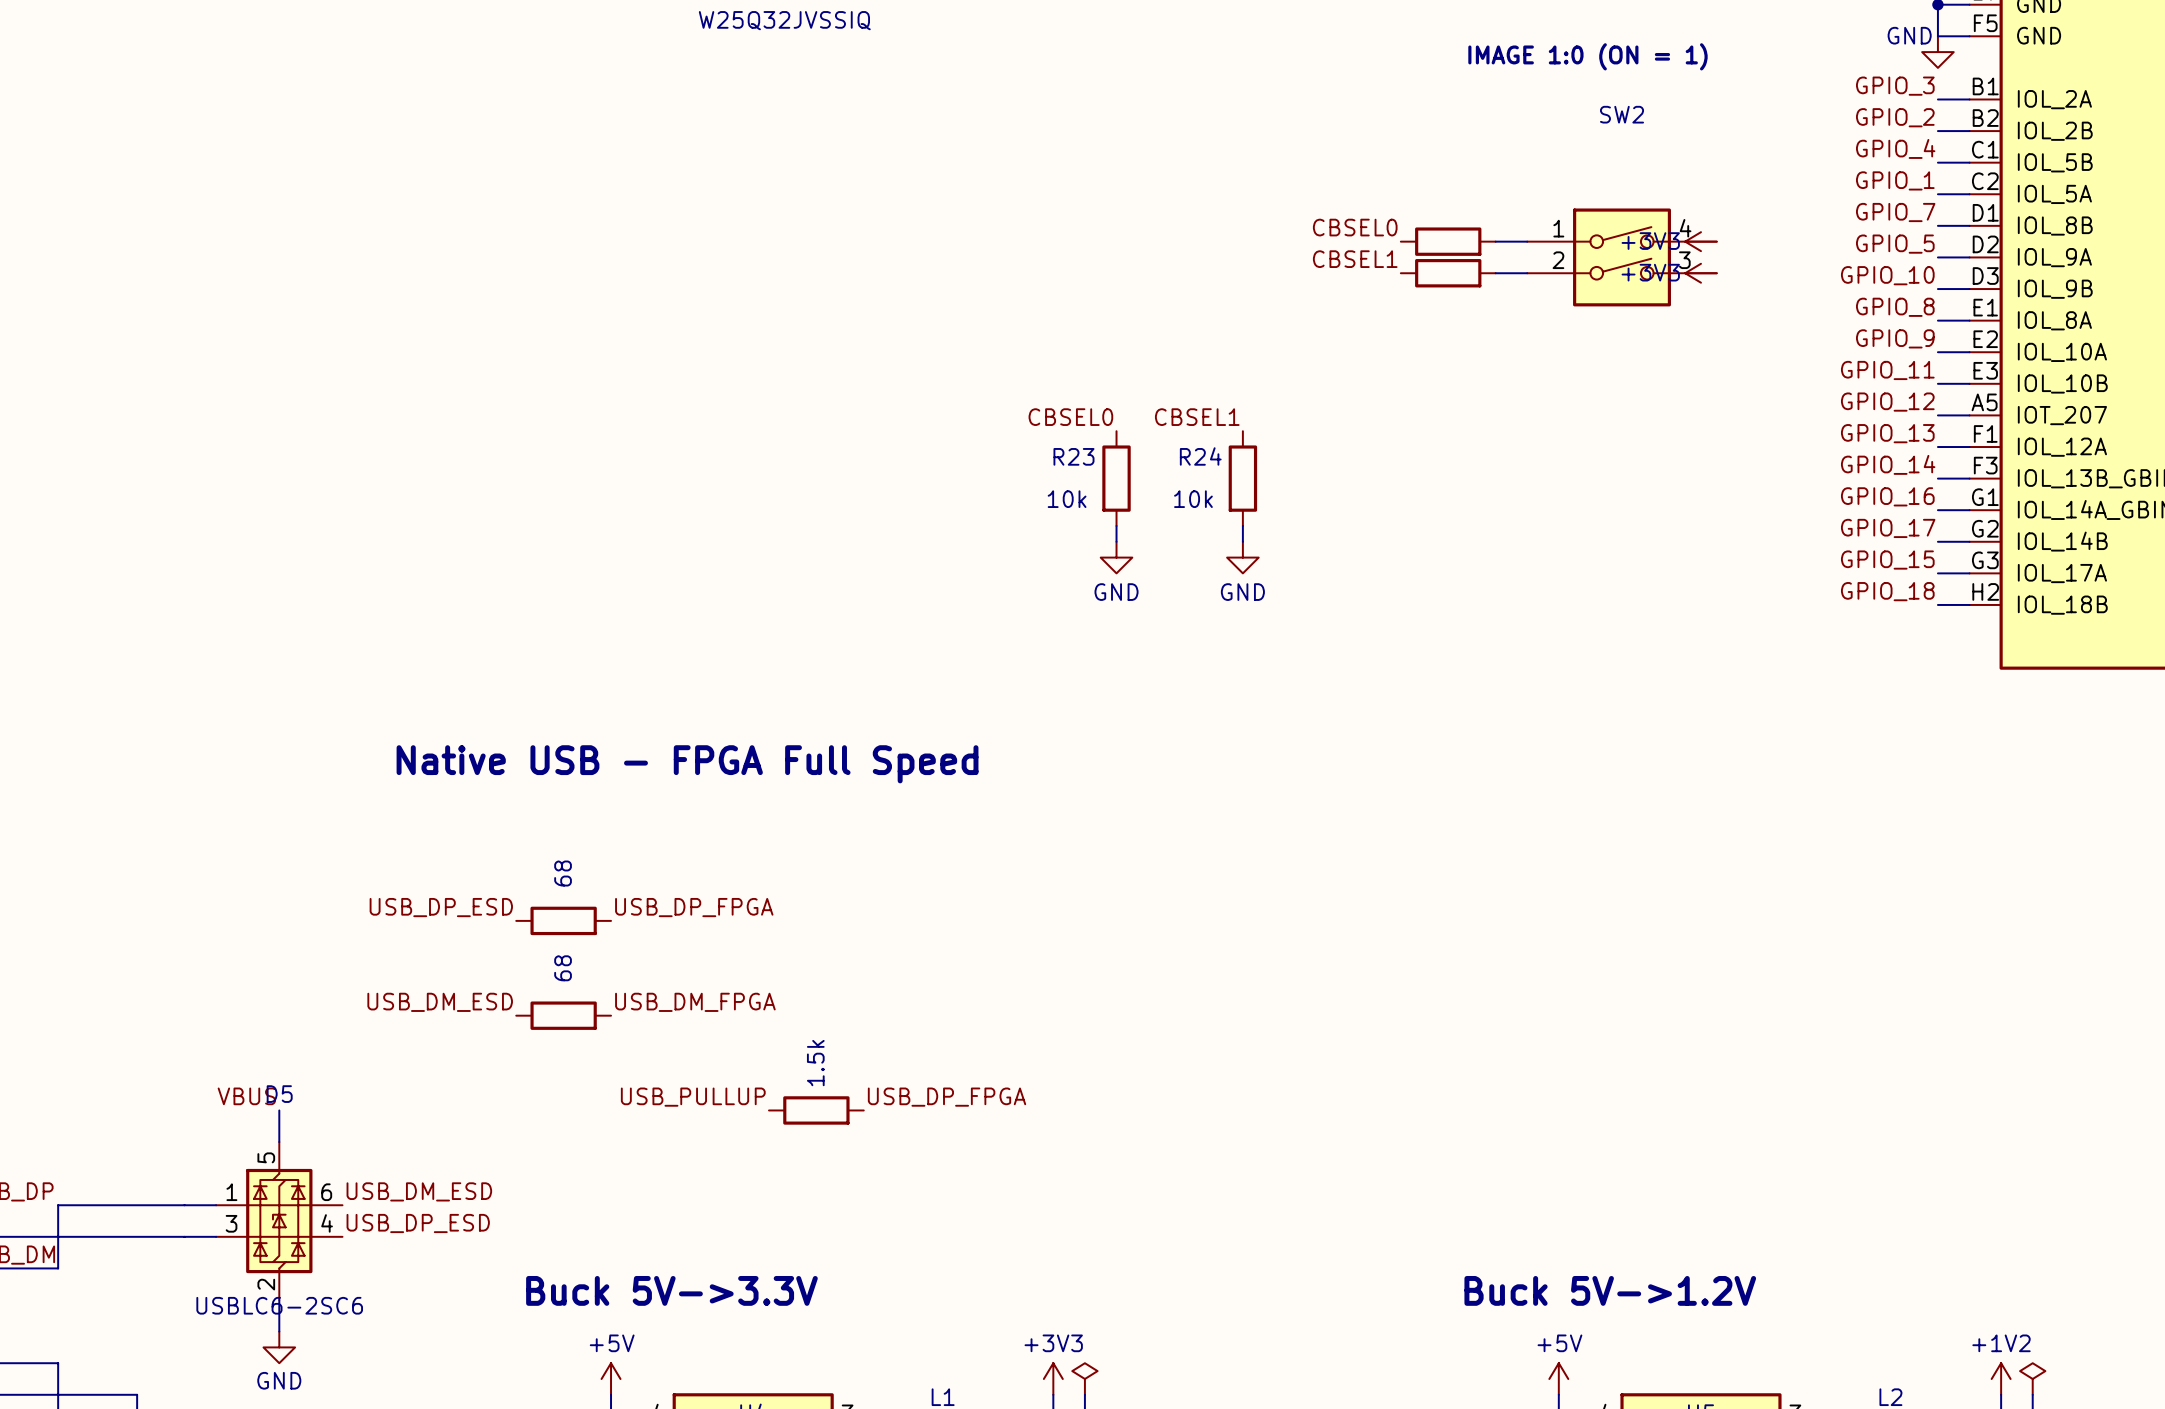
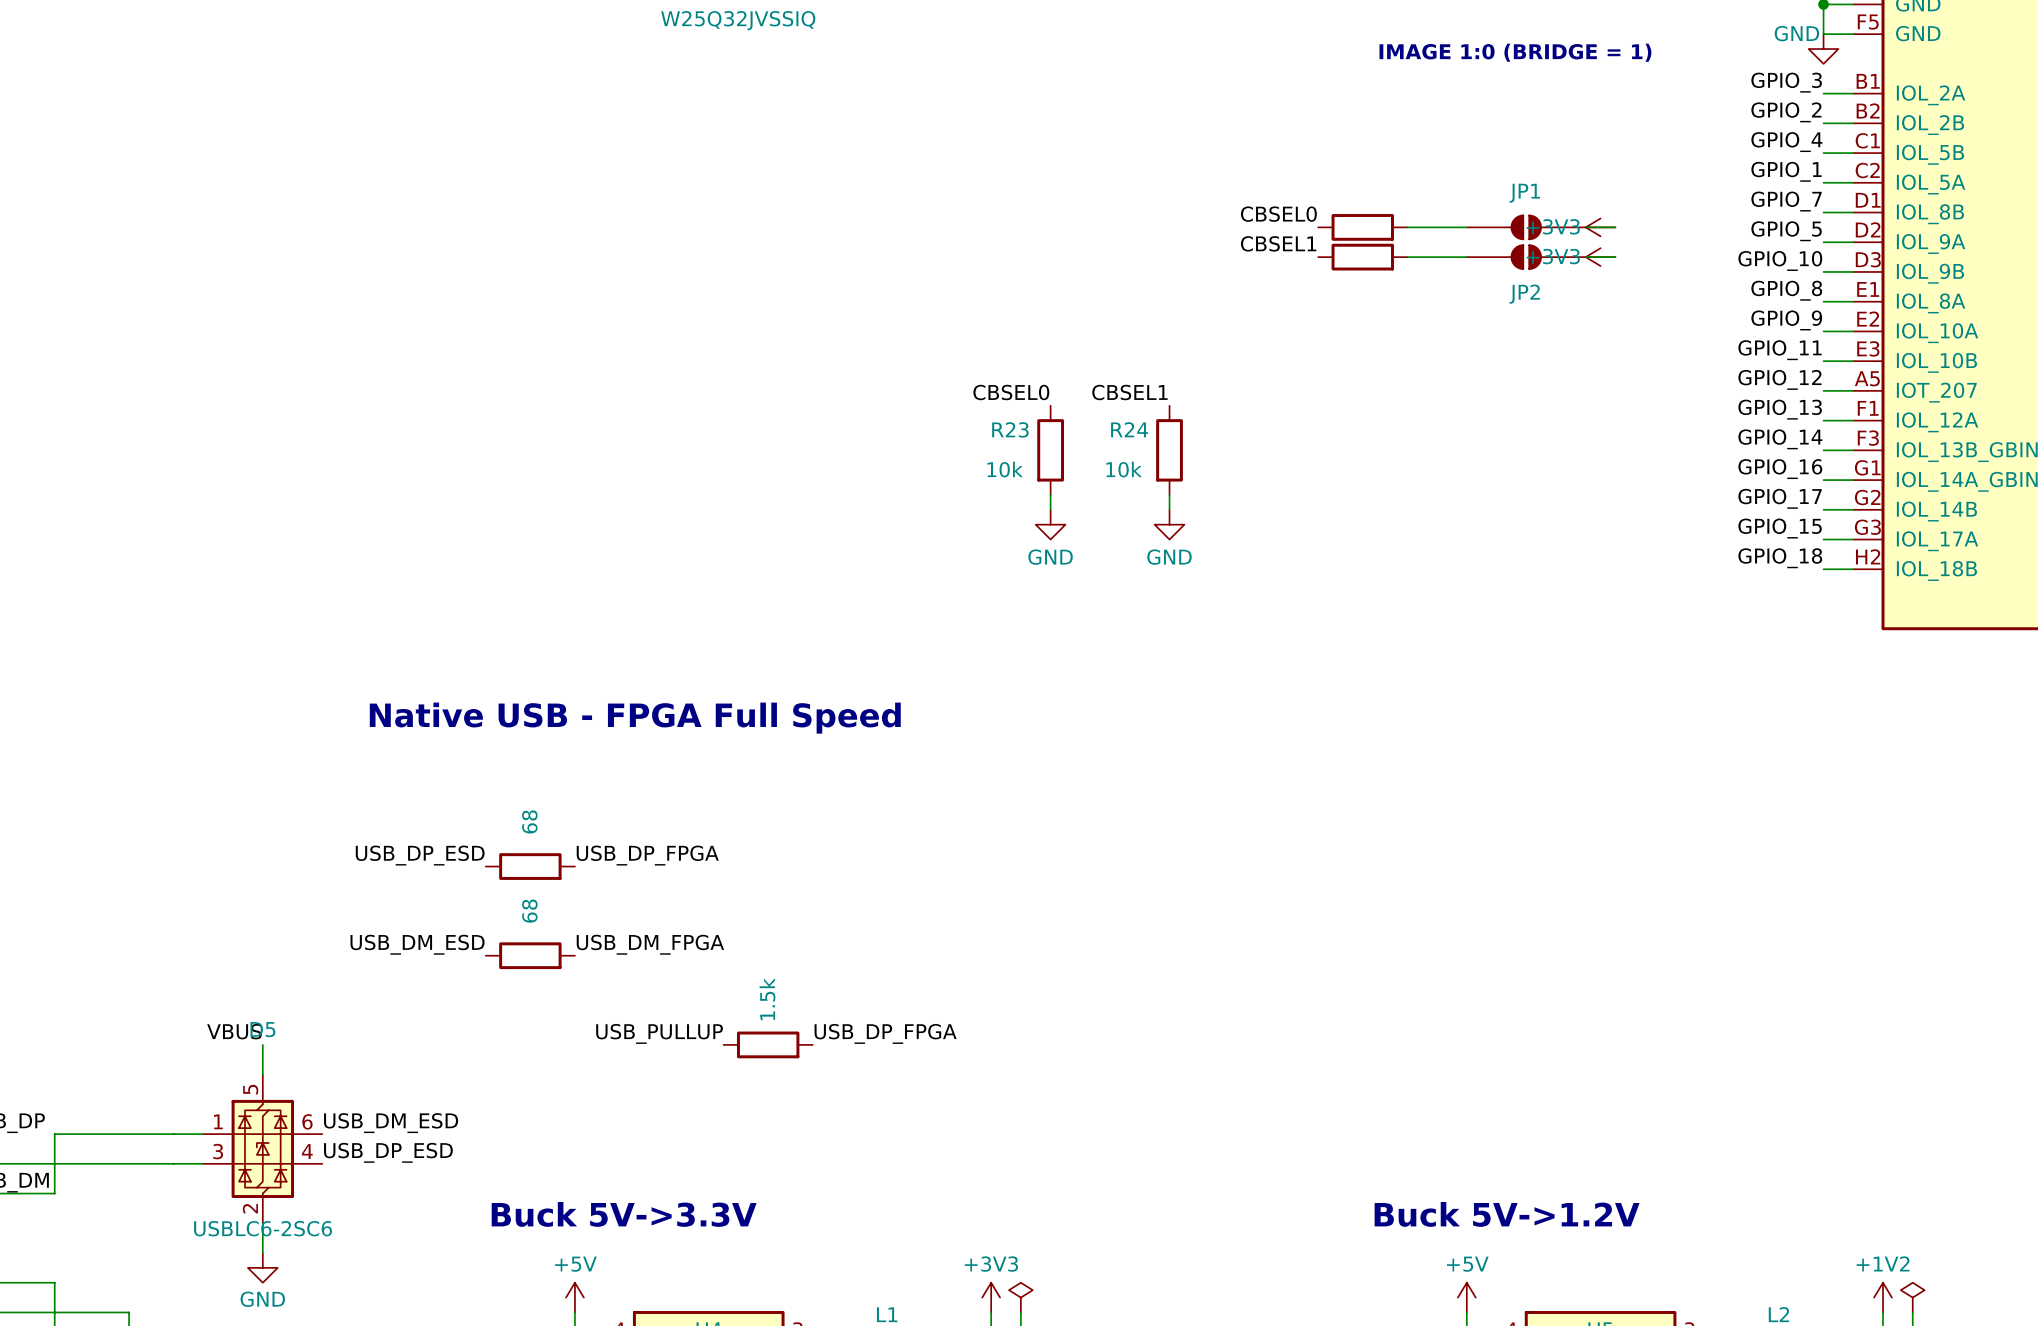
text: IMAGE 1:0 (ON = 1) (1587, 56) -> IMAGE 1:0 (BRIDGE = 1) (1515, 52)
JP1: none -> (1526, 227)
SW2: (1622, 257) -> none
JP2: none -> (1526, 257)

